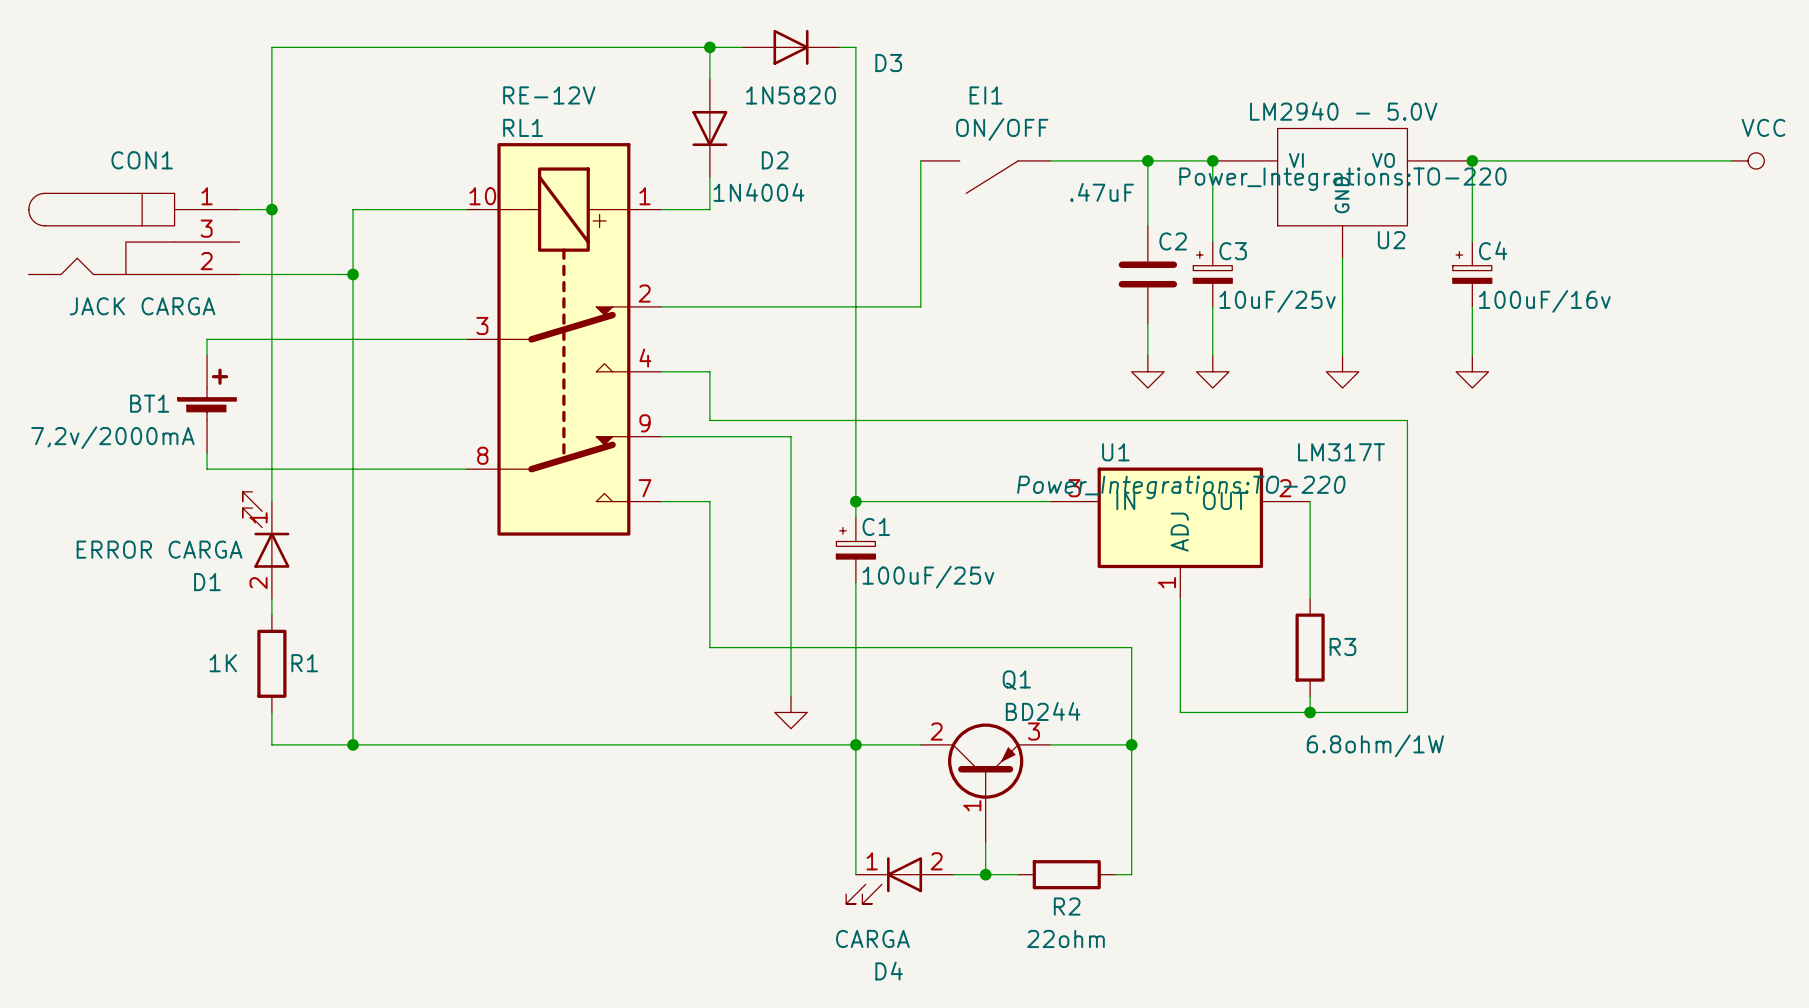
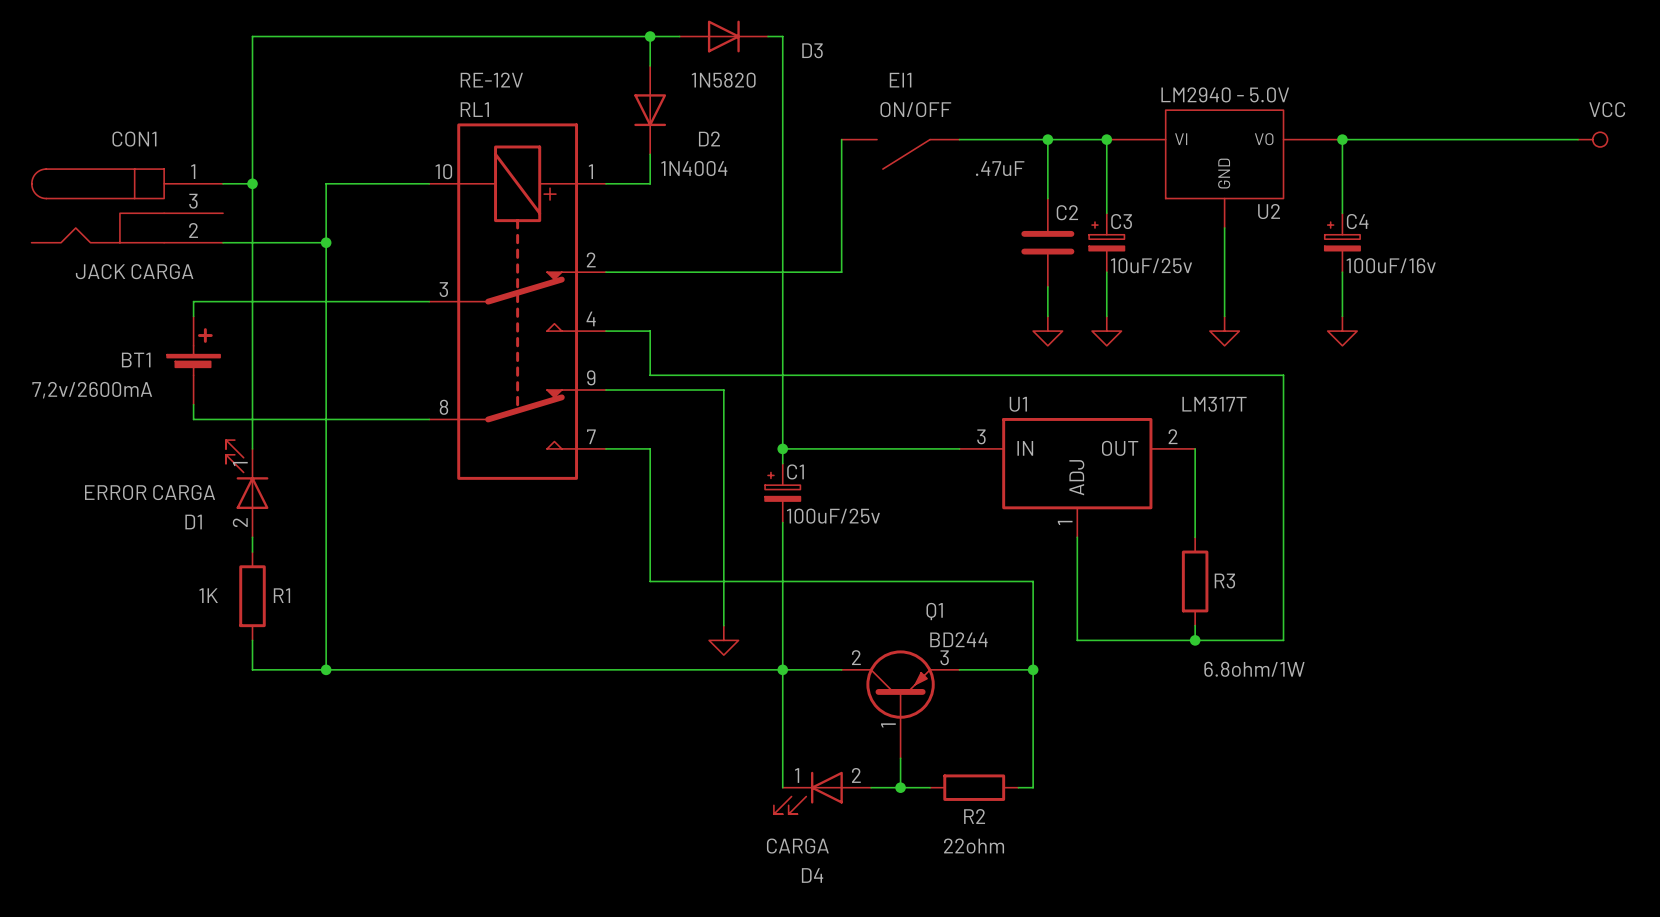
U2 text: Power_Integrations:TO-220 (1342, 179) -> none
BT1 value: 7,2v/2000mA (112, 437) -> 7,2v/2600mA (92, 390)
U1 text: Power_Integrations:TO-220 (1181, 487) -> none

